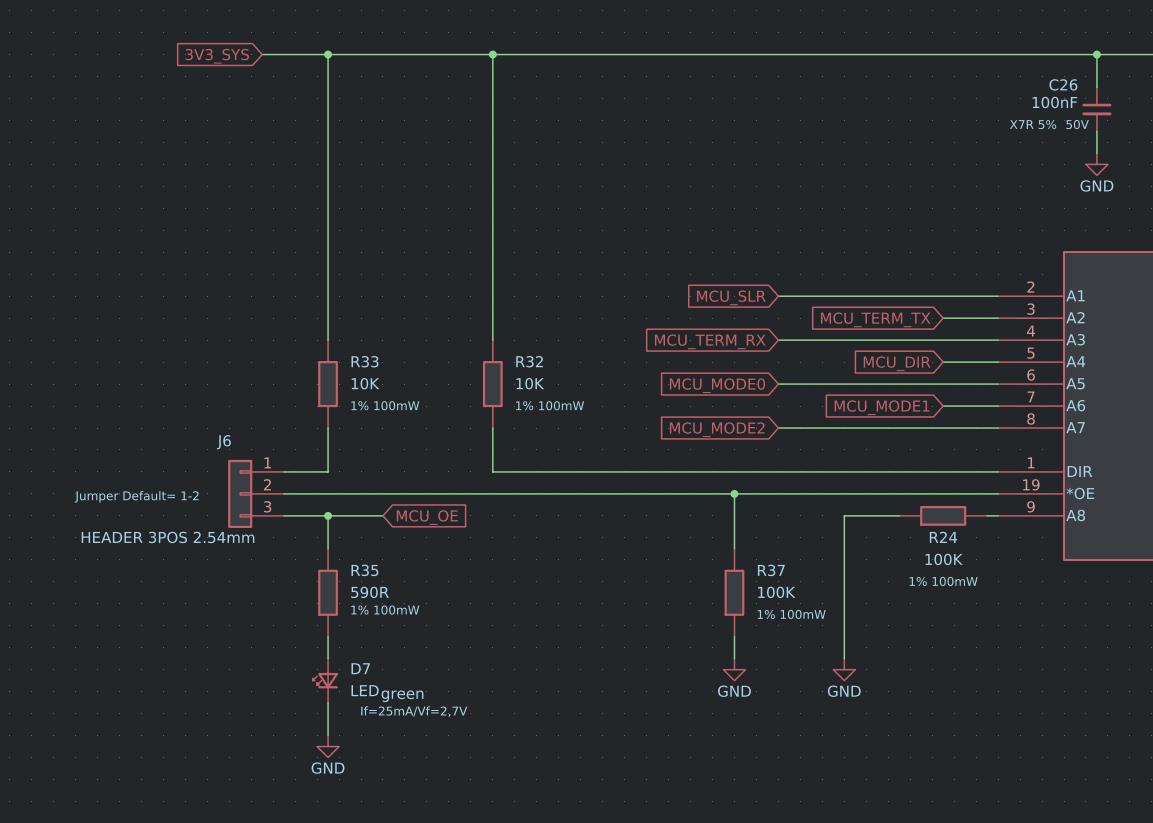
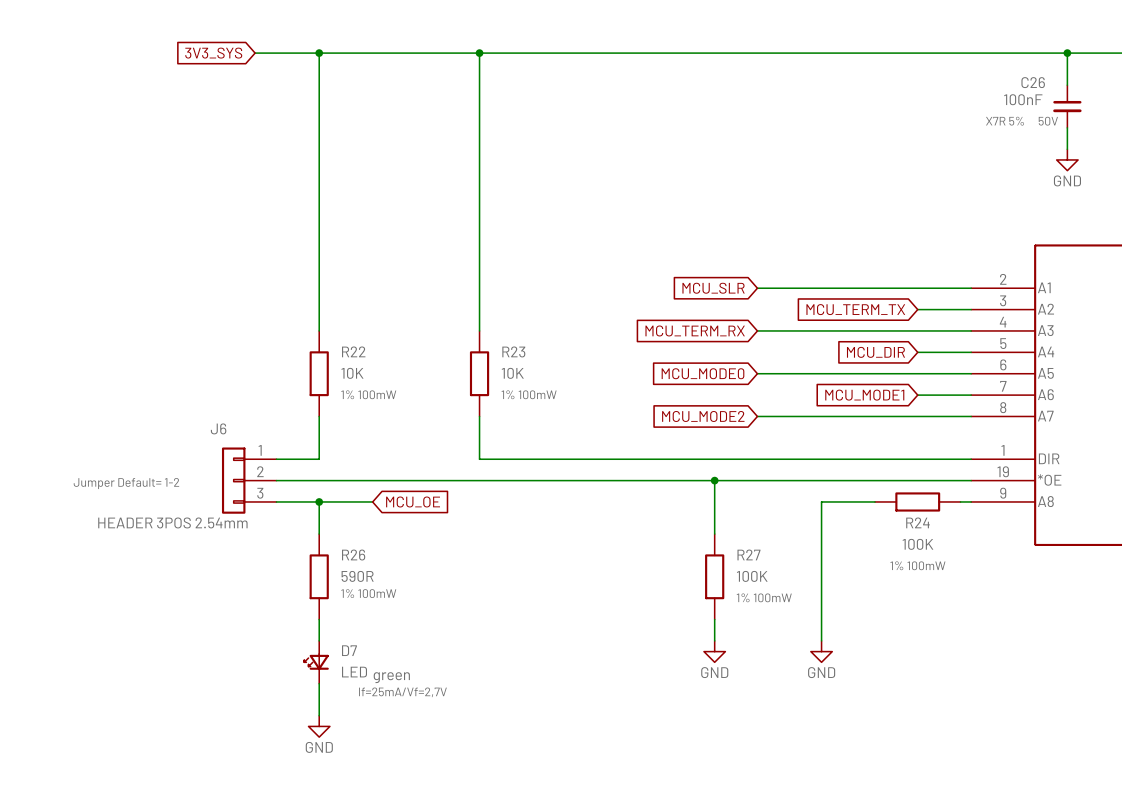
R33 name: R33 (364, 361) -> R22 (353, 351)
R32 name: R32 (529, 361) -> R23 (513, 351)
R35 name: R35 (364, 570) -> R26 (353, 555)
R37 name: R37 (771, 570) -> R27 (748, 554)

